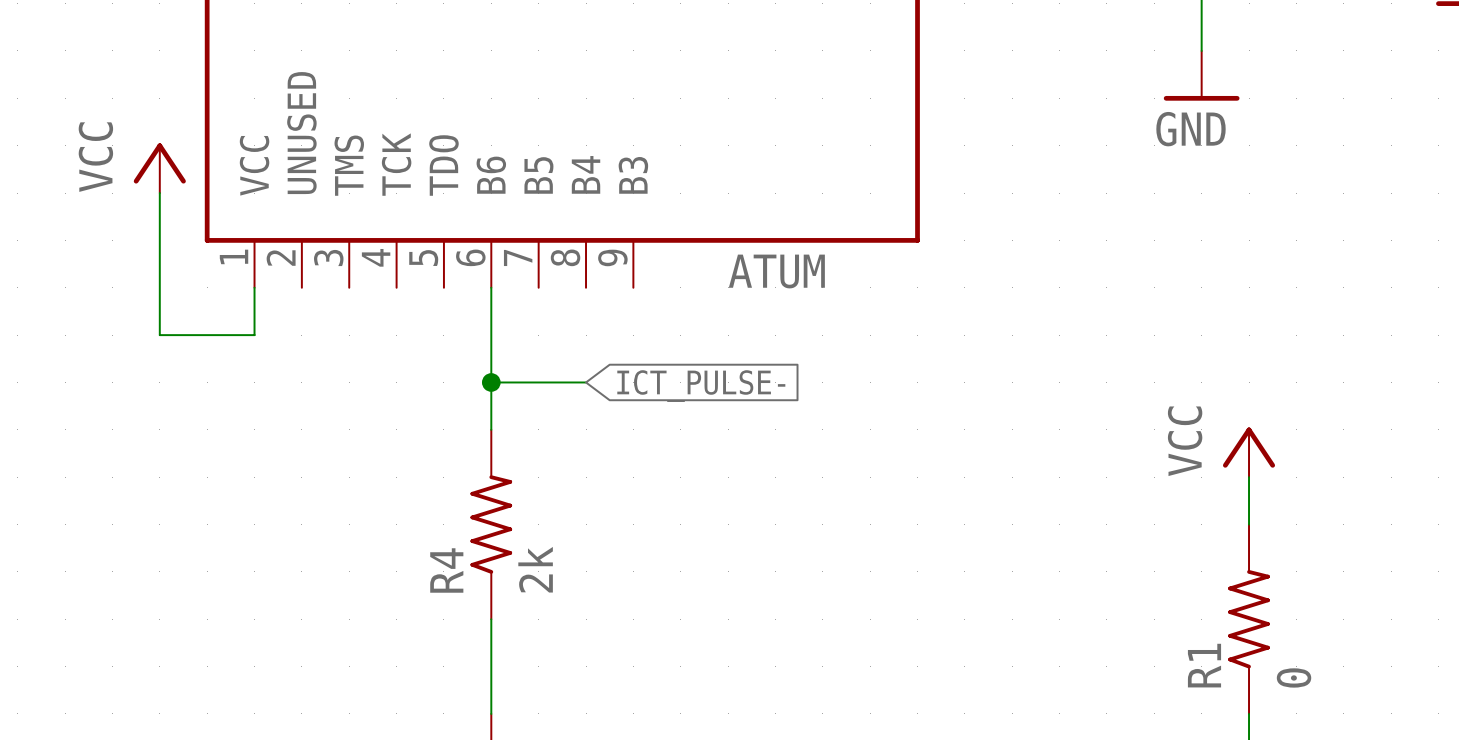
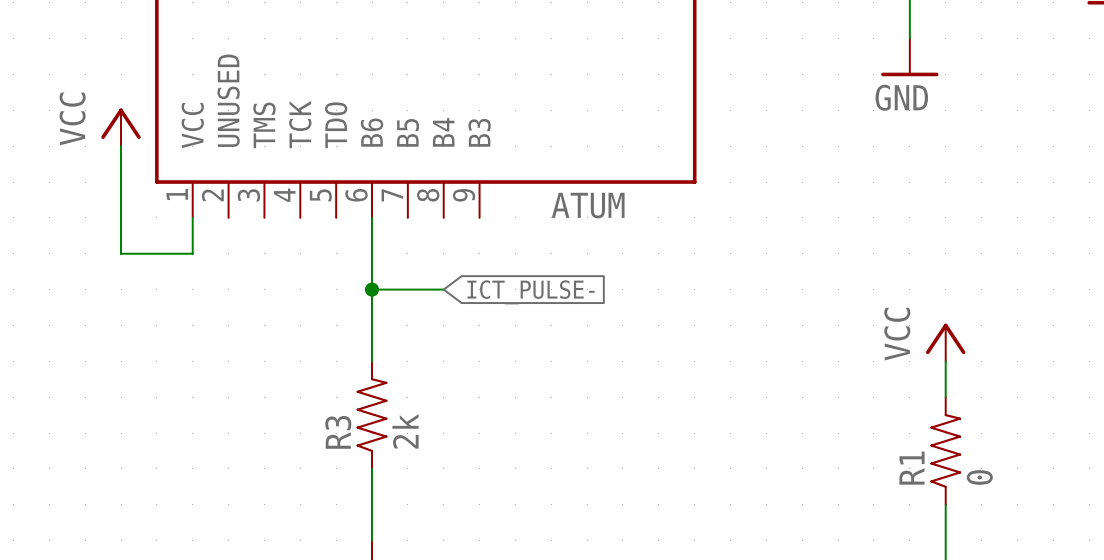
R4: 2k (491, 524) -> none
R1 symbol: [1228, 524, 1270, 714] -> [930, 396, 962, 506]
R3: none -> 2k (372, 415)

